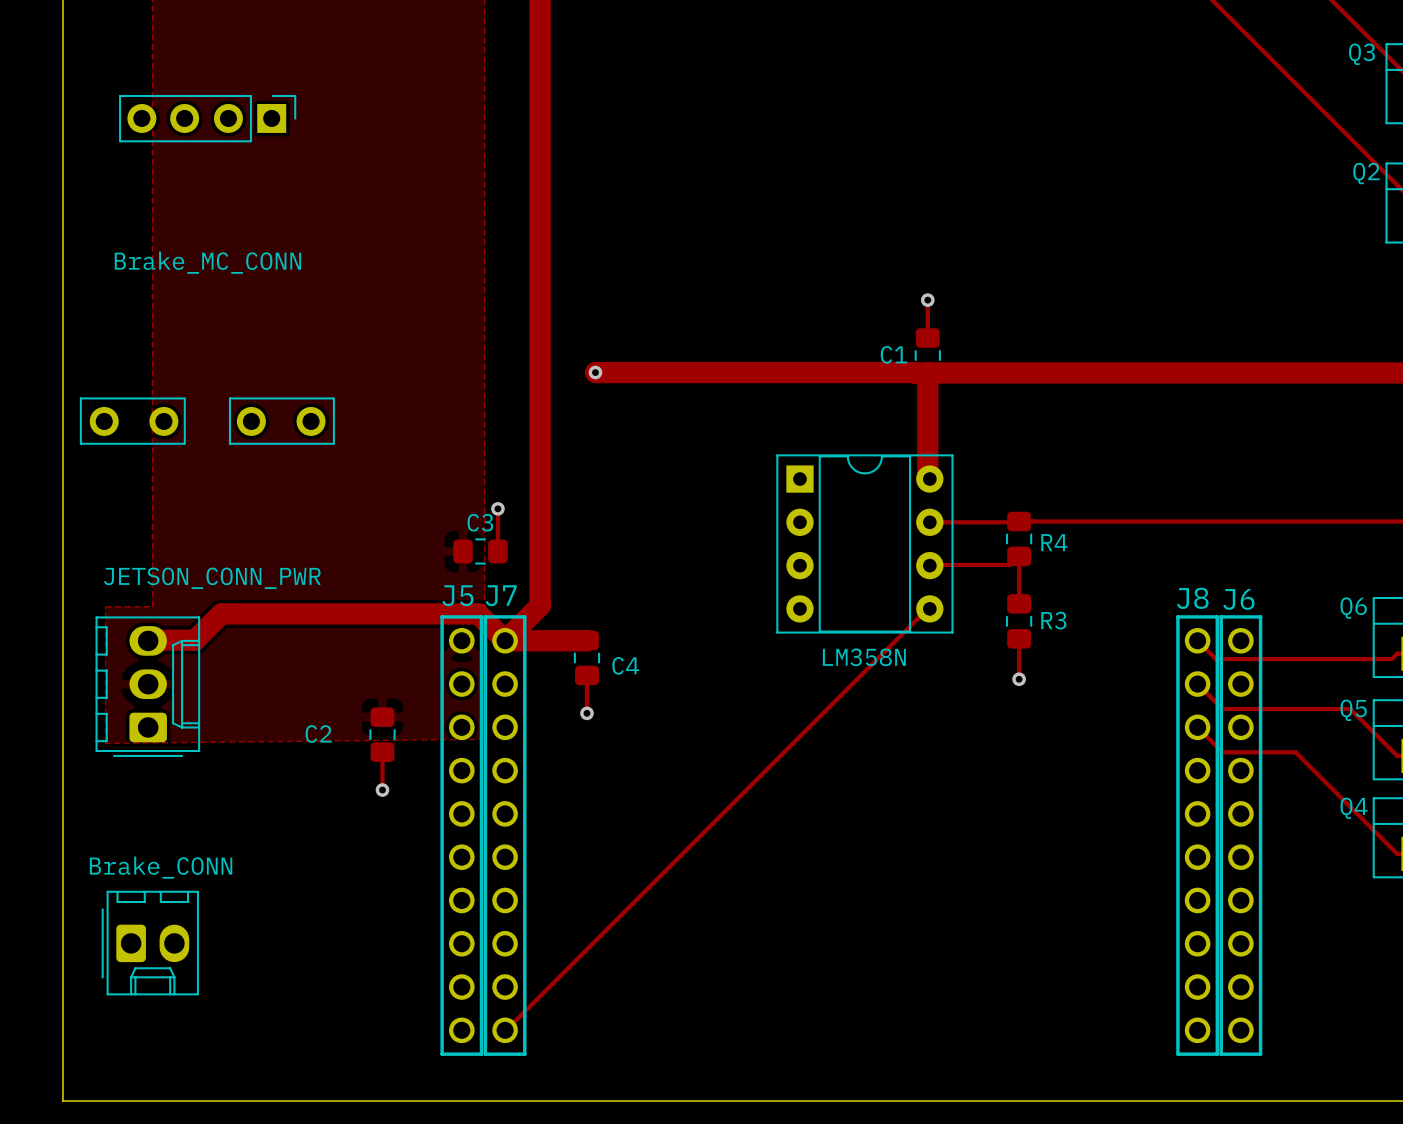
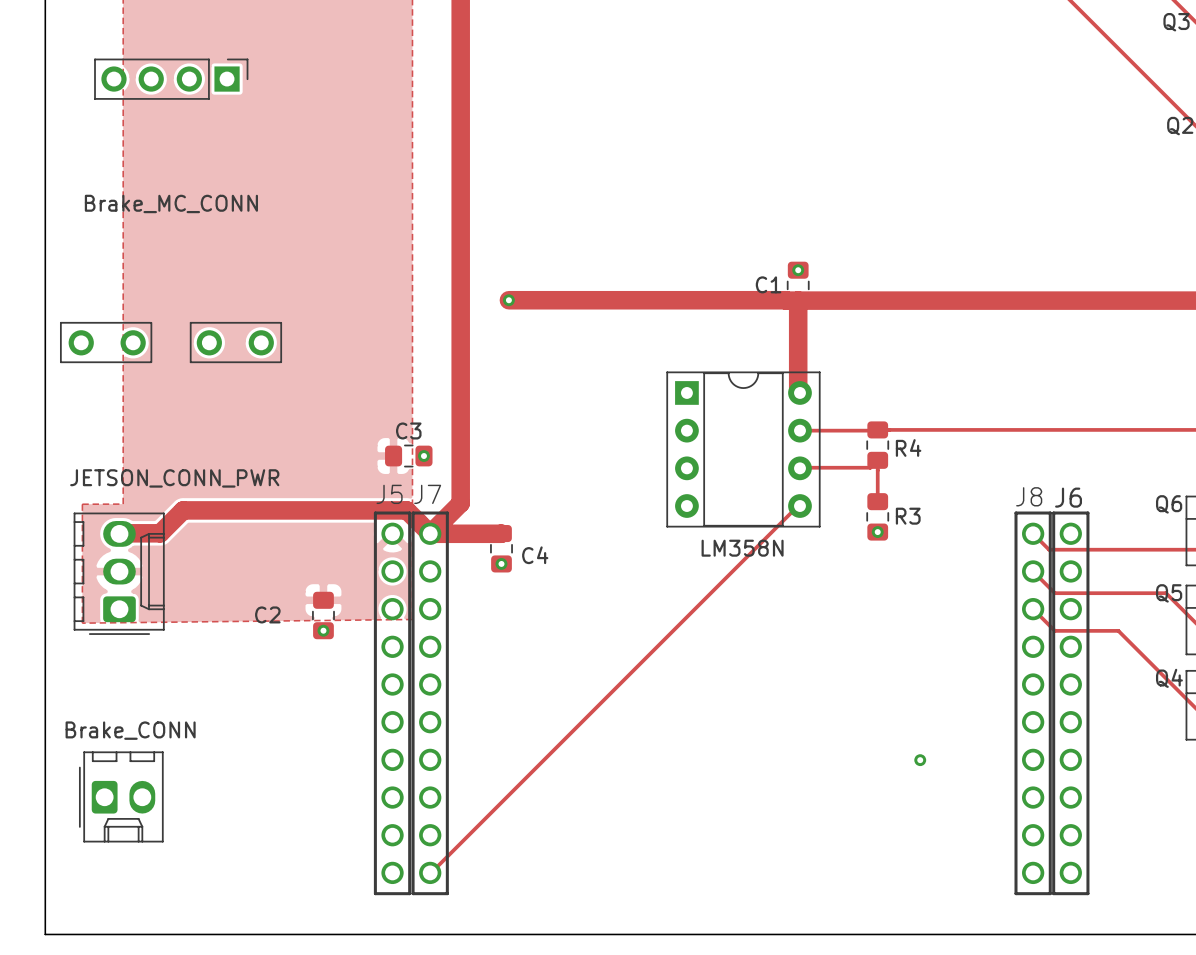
track: (927, 300) (927, 338) -> none
via position: (927, 300) -> (798, 270)
track: (497, 508) (497, 551) -> none
via position: (497, 508) -> (423, 456)
track: (1019, 638) (1019, 679) -> none
track: (586, 675) (586, 713) -> none
via position: (1019, 679) -> (877, 532)
via position: (586, 713) -> (501, 563)
track: (382, 752) (382, 790) -> none
via position: (382, 790) -> (323, 630)
via: none -> (920, 760)

